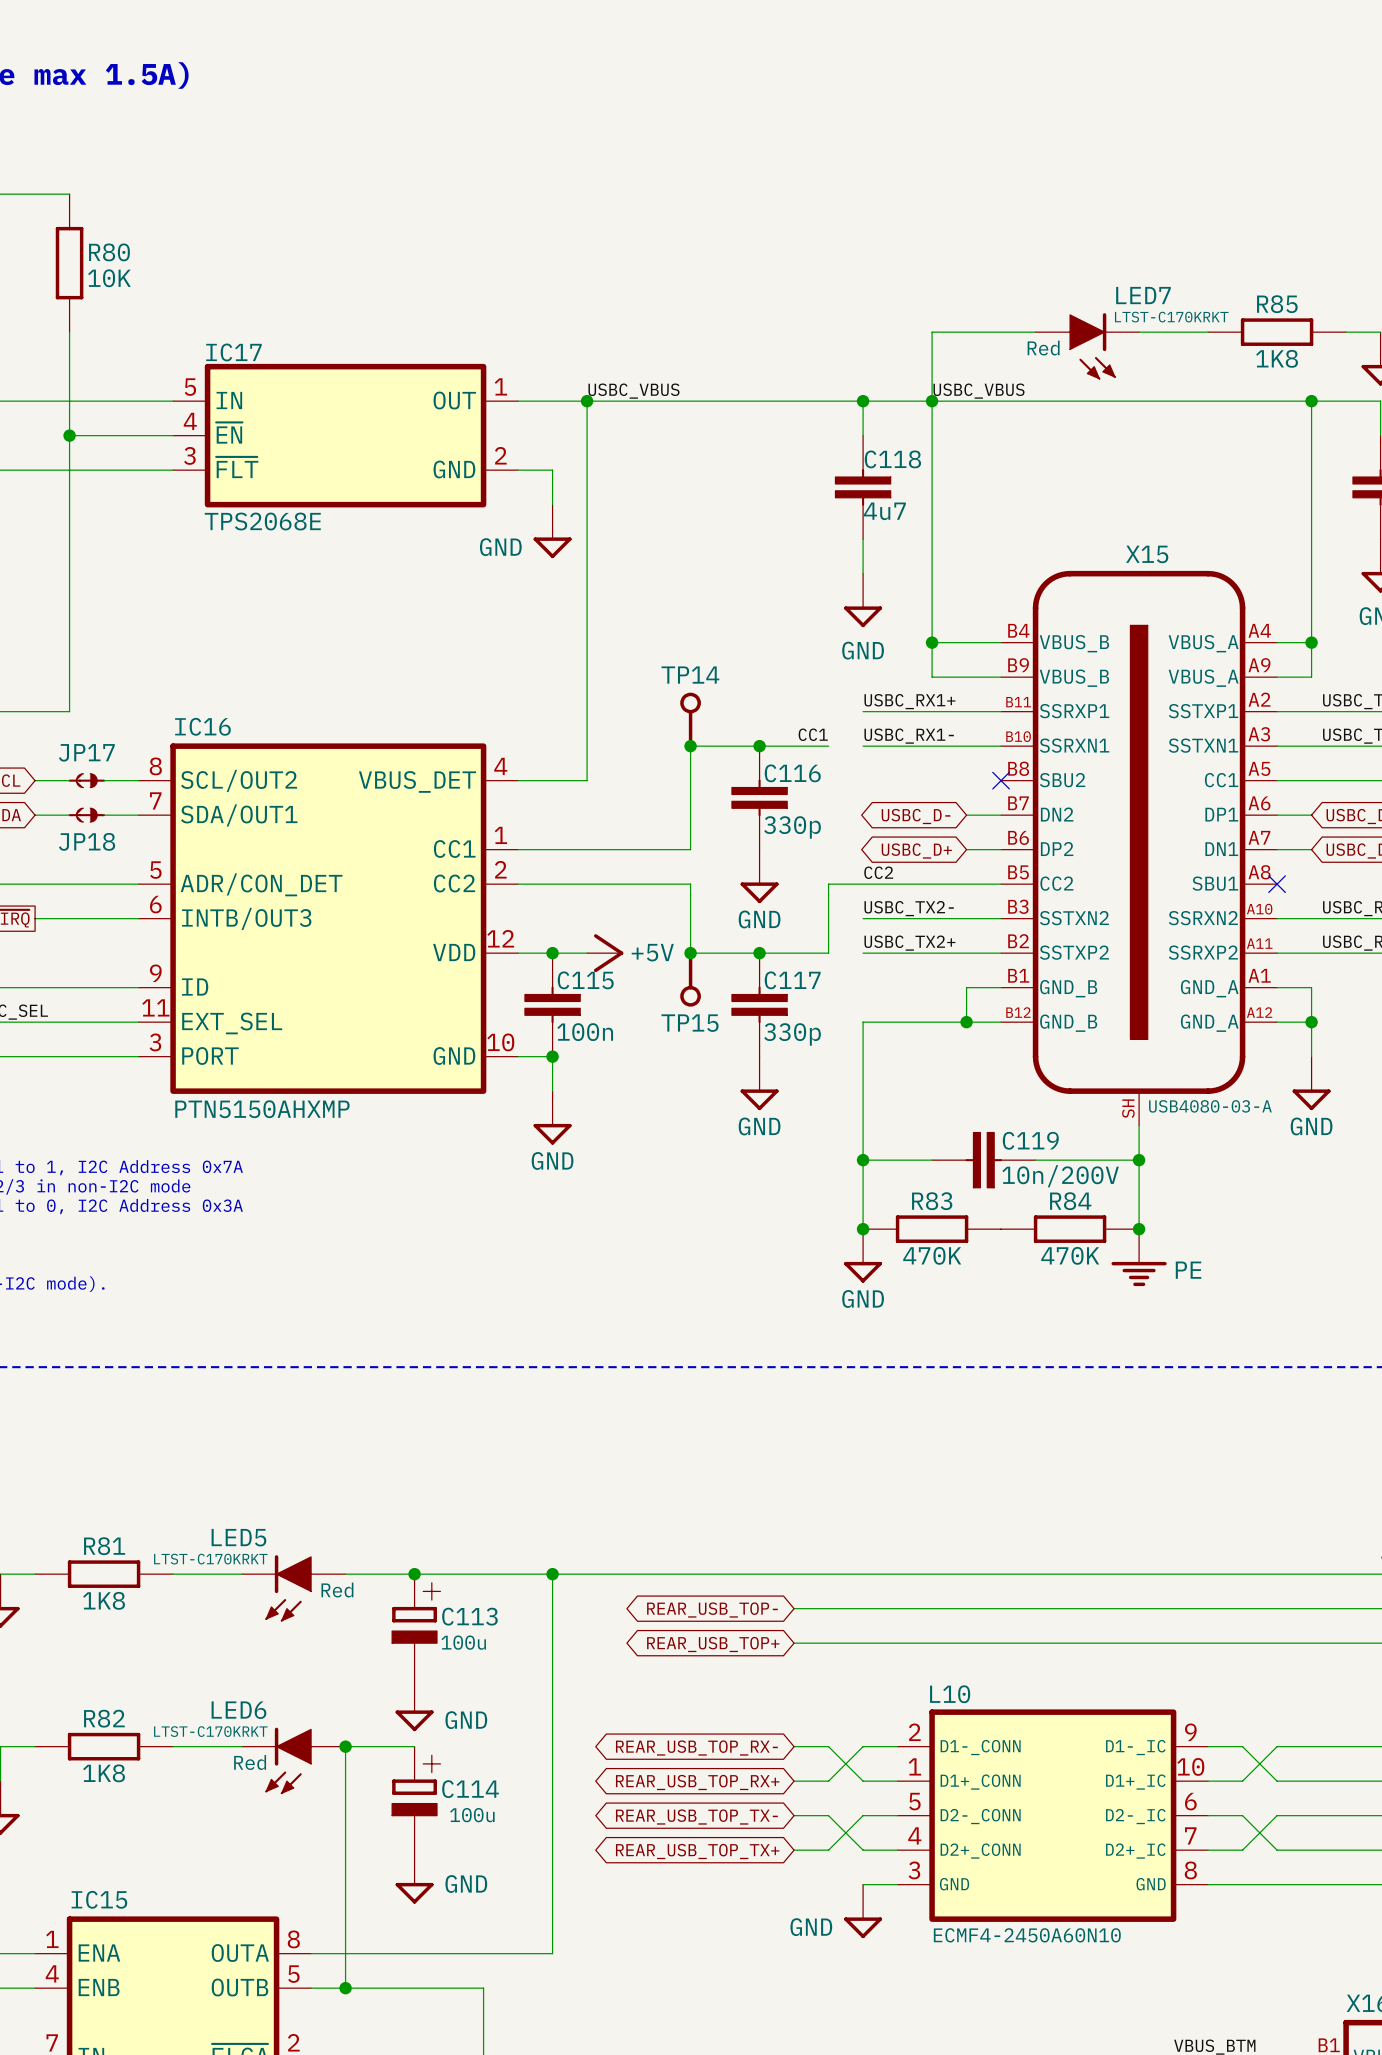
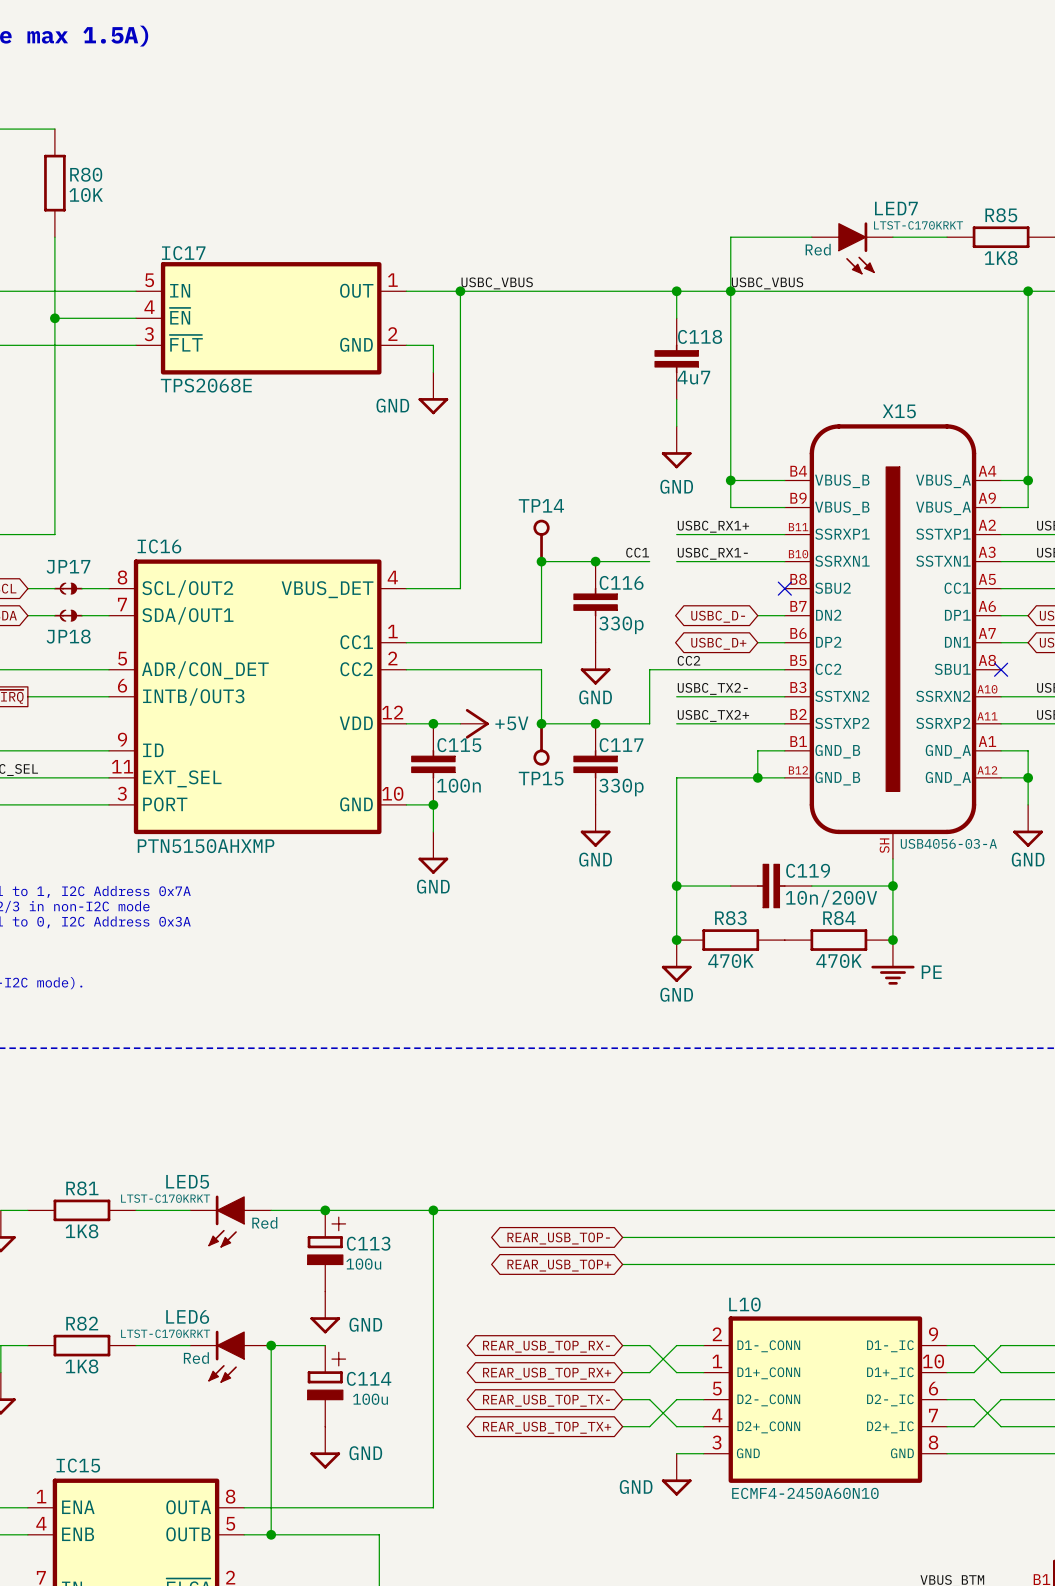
X15 value: USB4080-03-A (1210, 1106) -> USB4056-03-A (948, 843)

